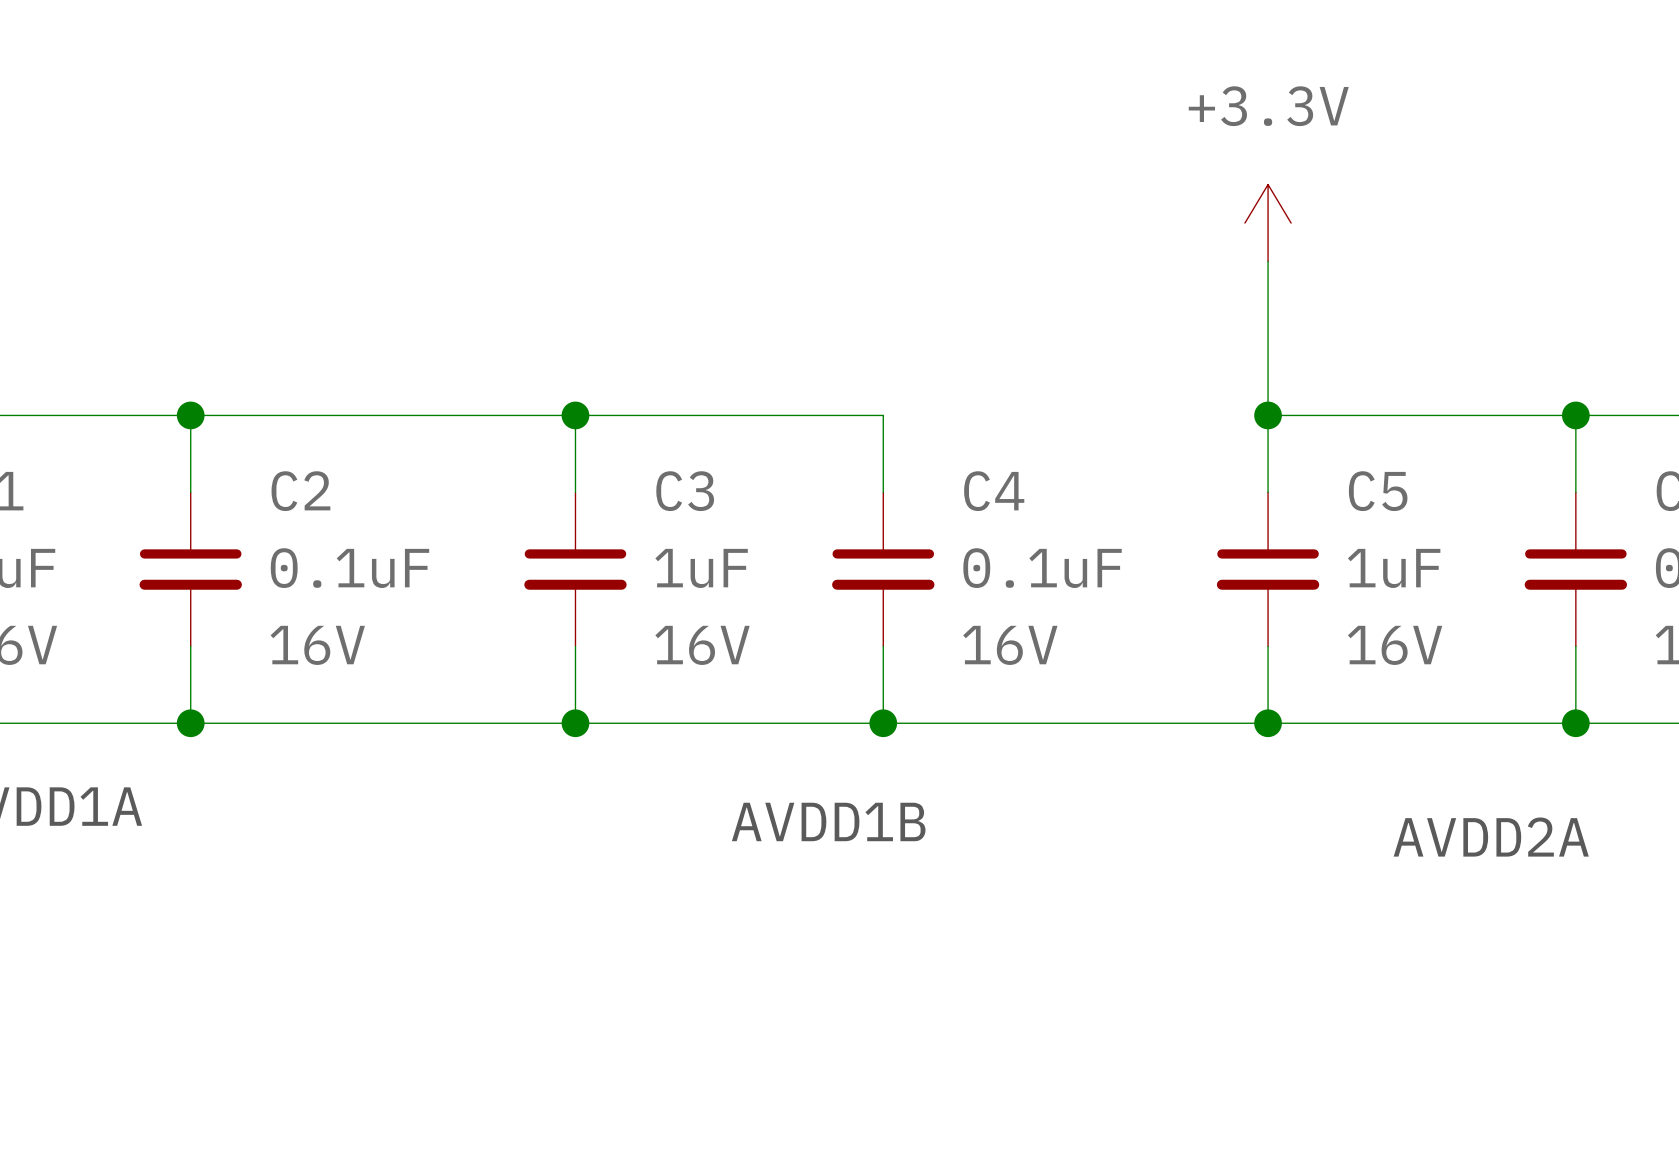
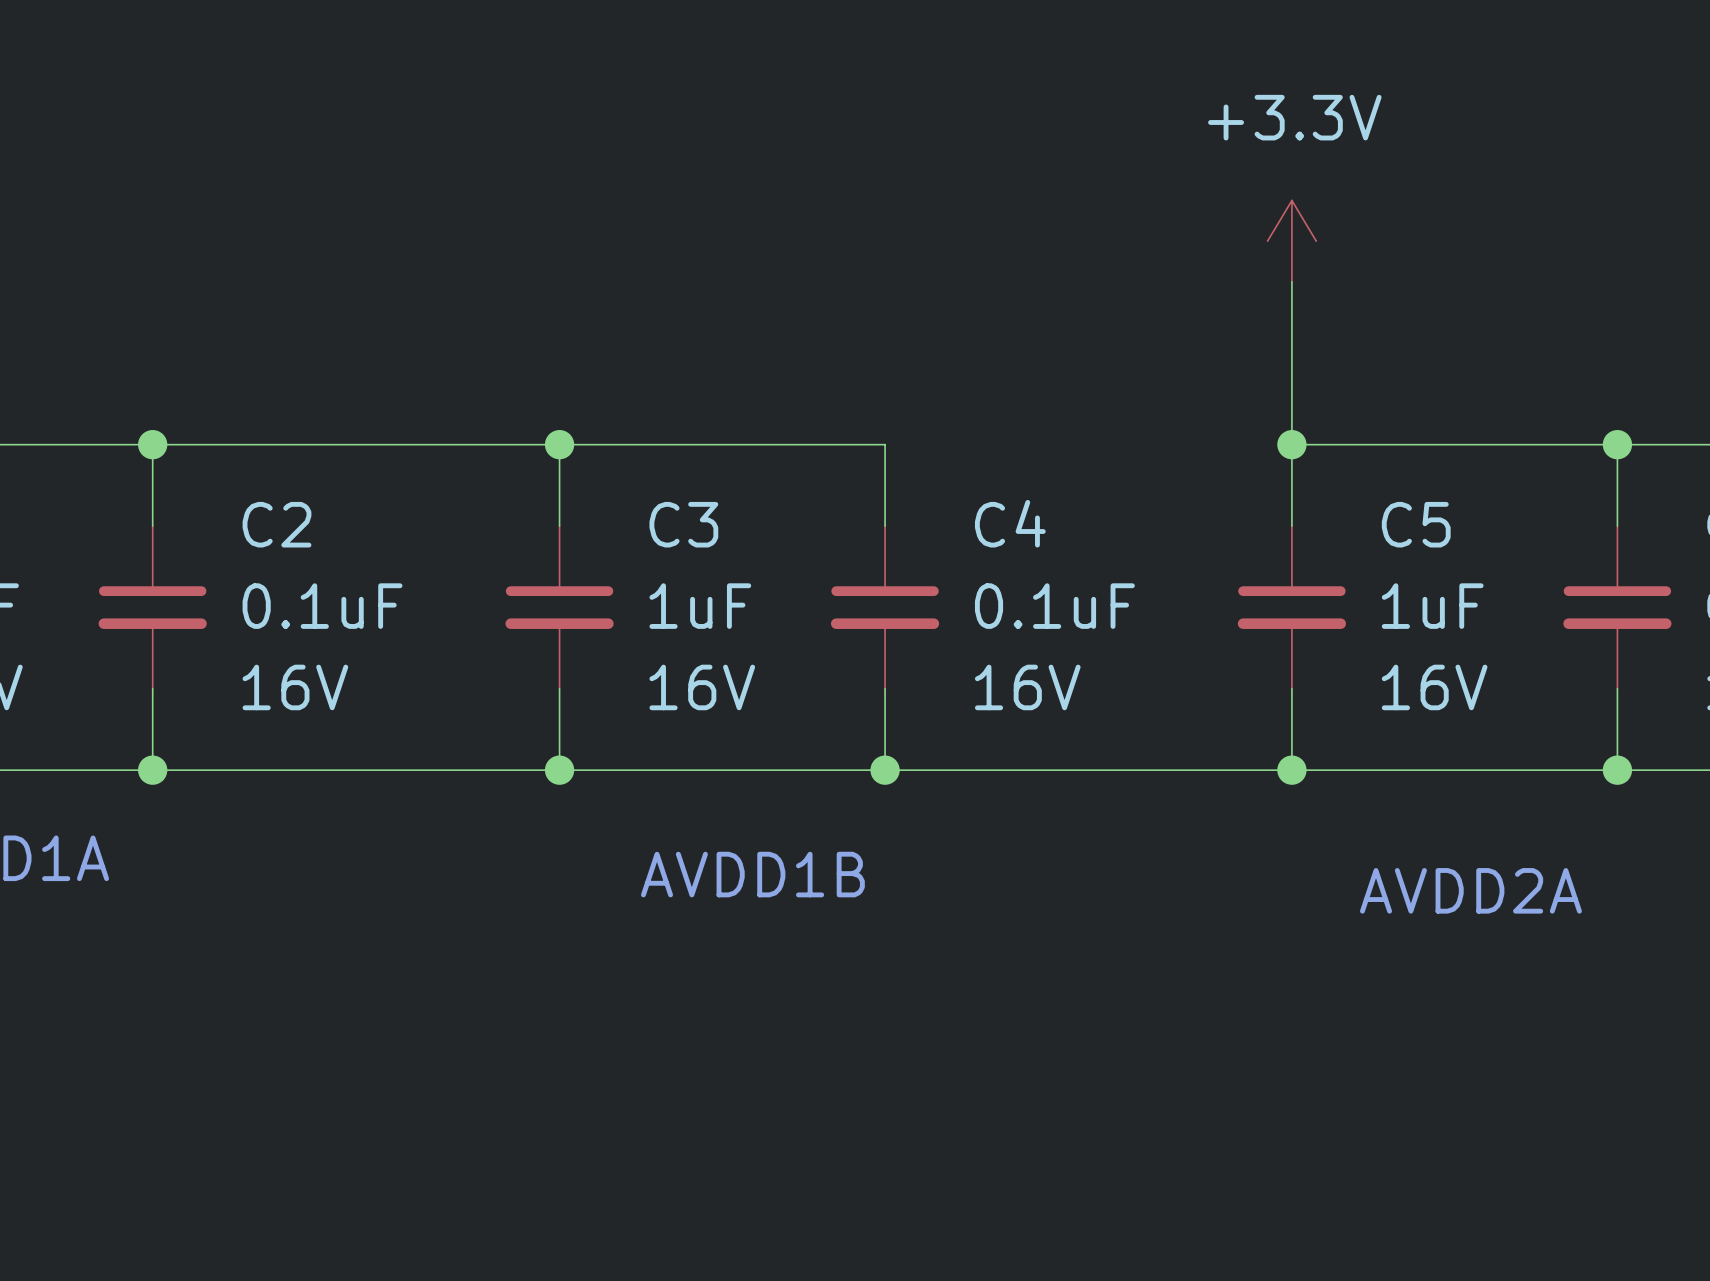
text position: AVDD1B (828, 821) -> AVDD1B (752, 874)
text position: AVDD2A (1491, 837) -> AVDD2A (1470, 890)

